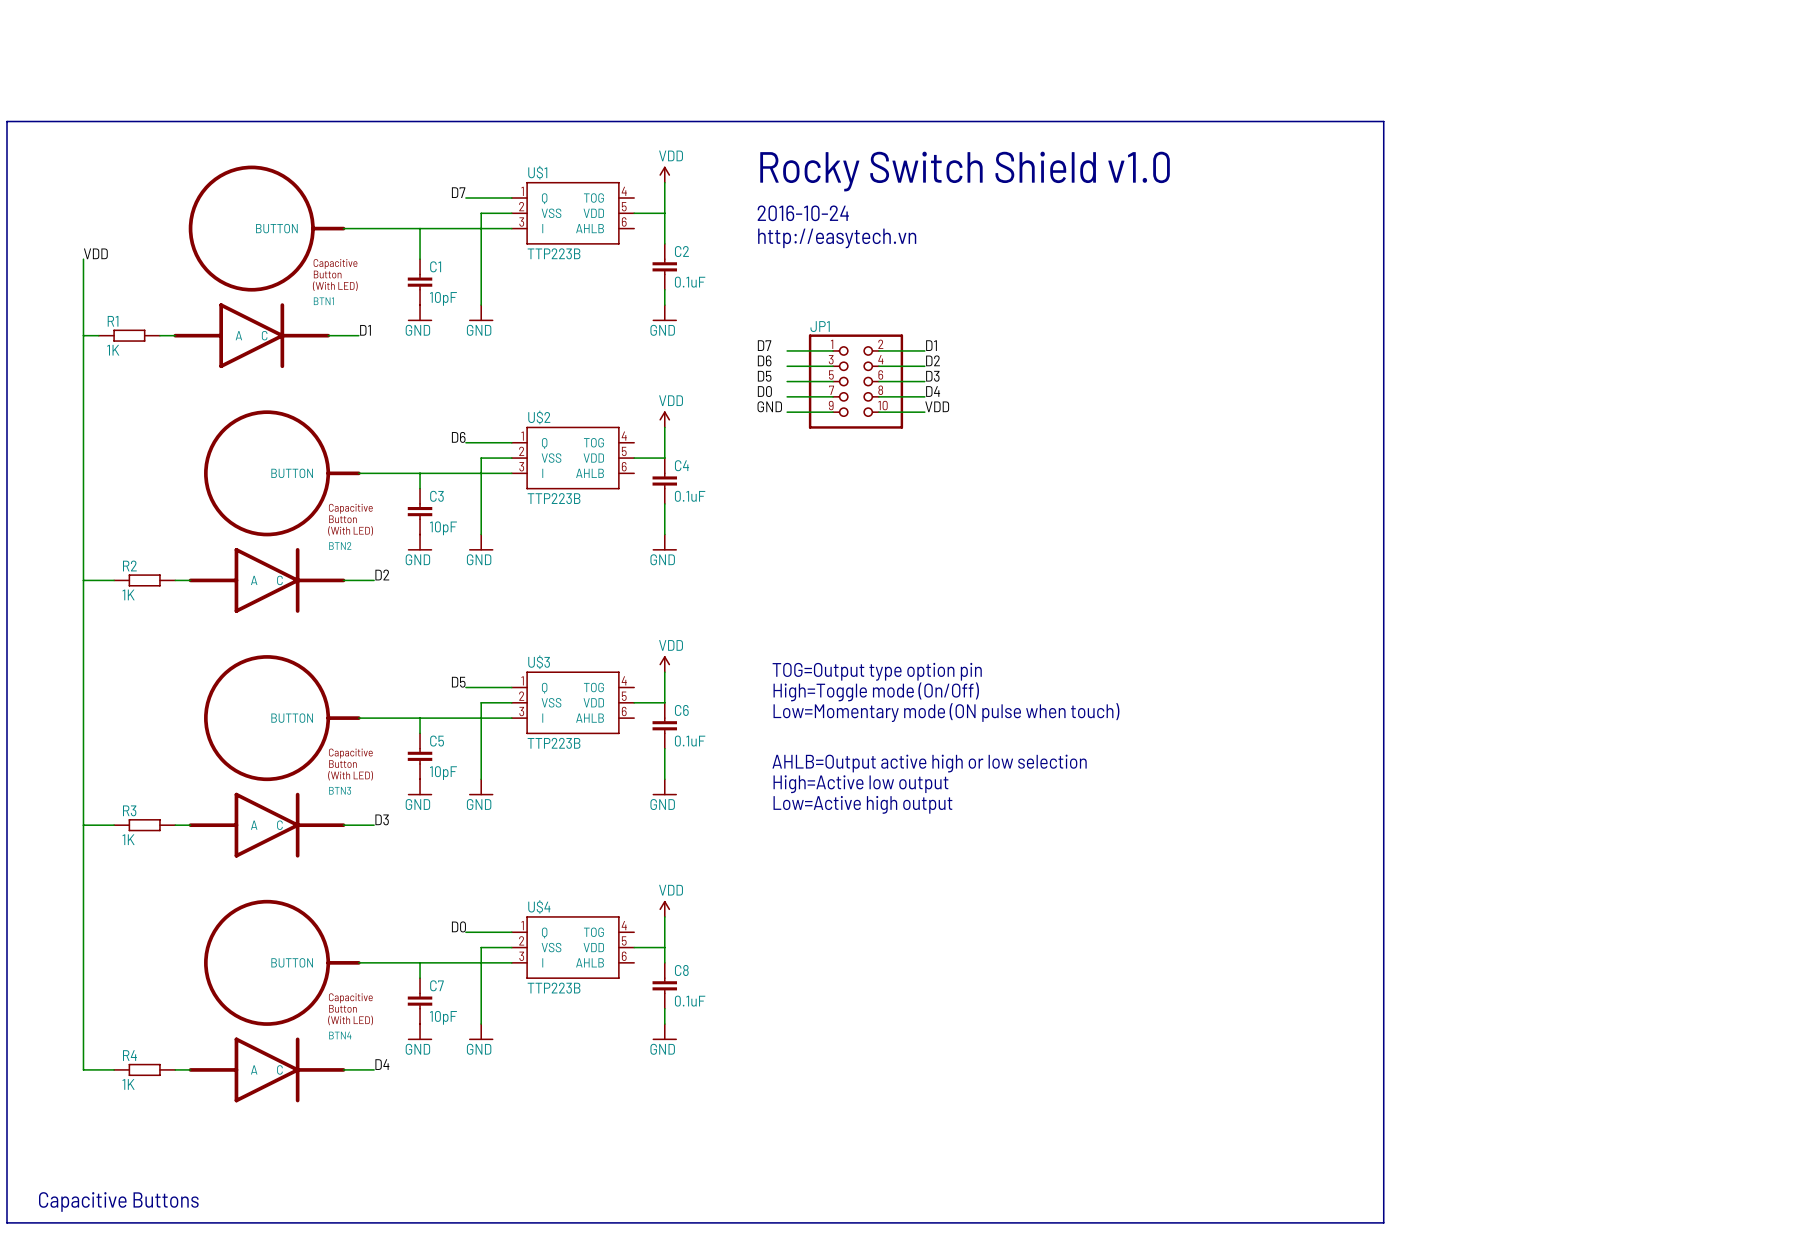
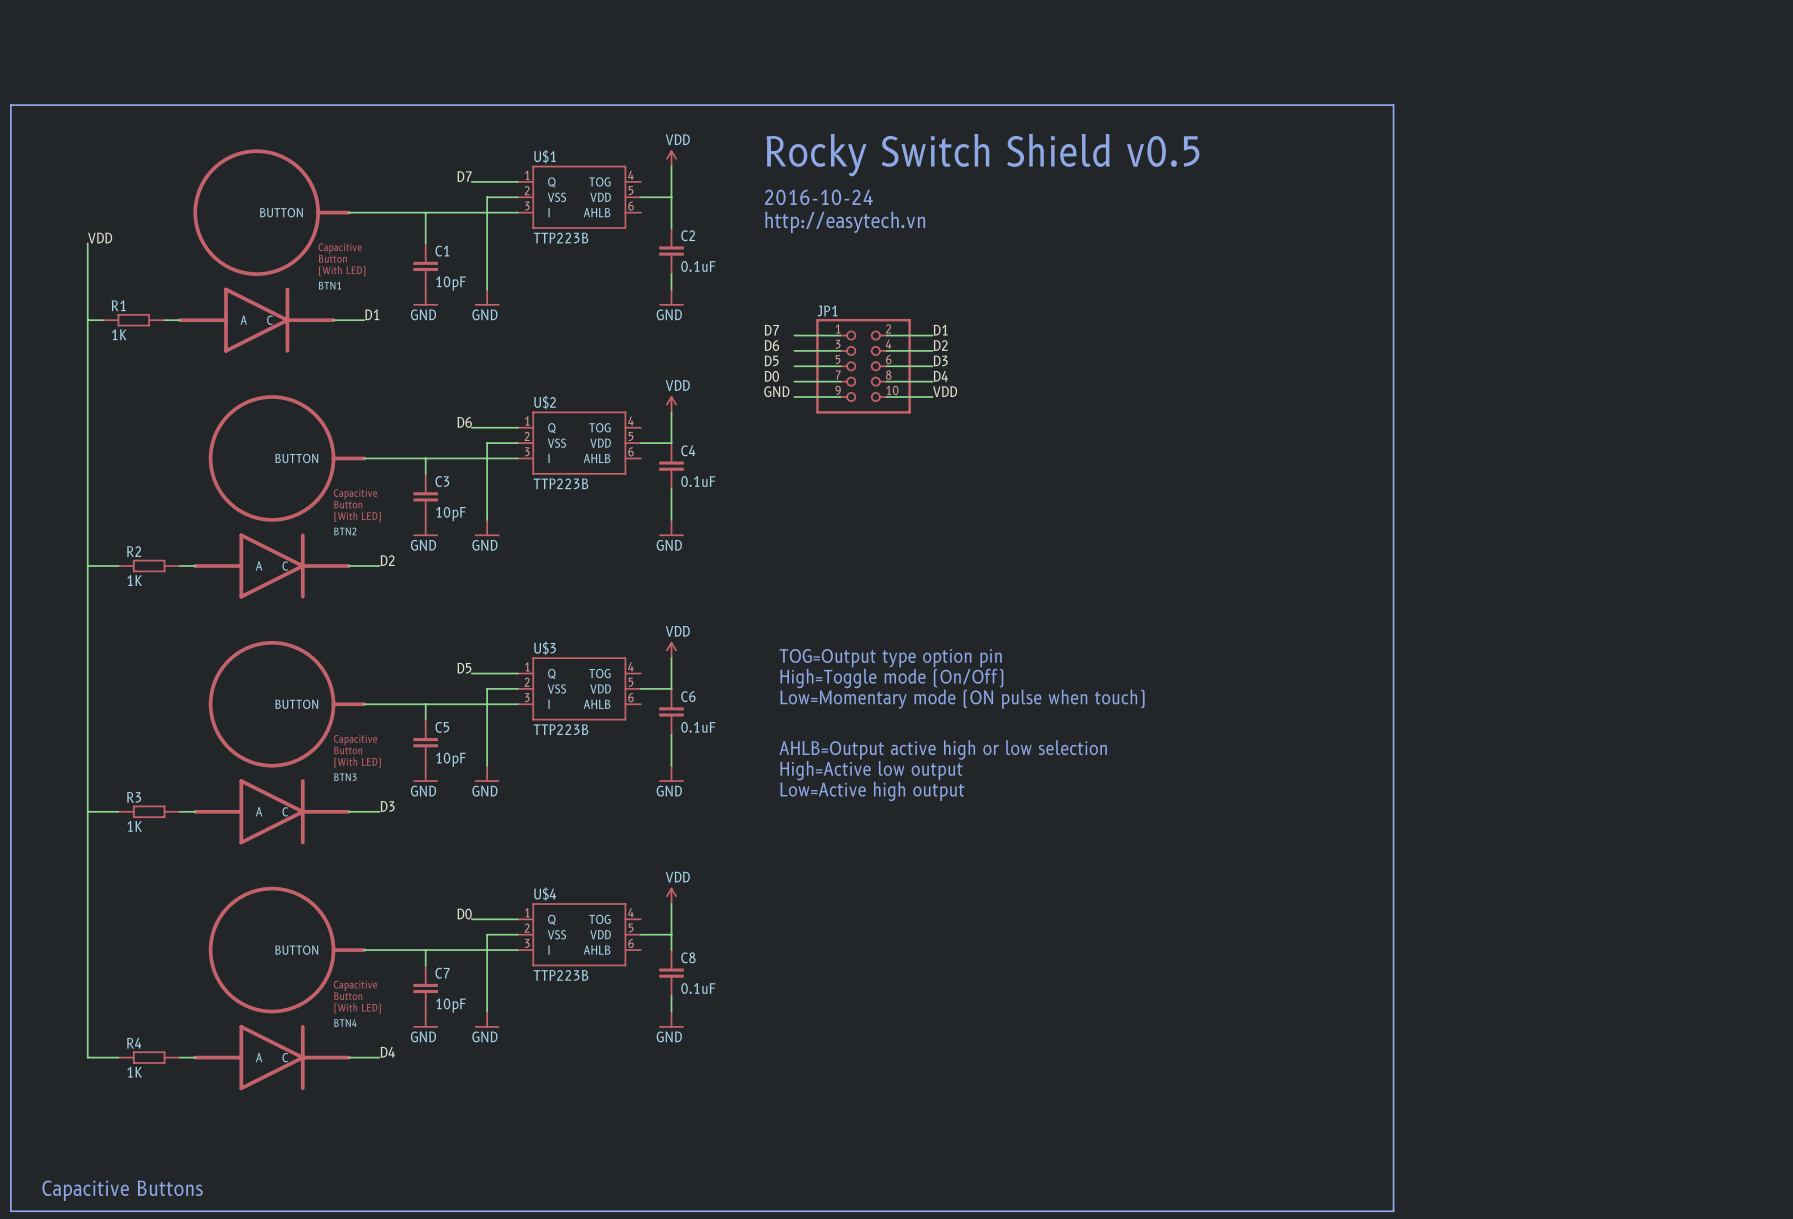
text: Rocky Switch Shield v1.0 (965, 171) -> Rocky Switch Shield v0.5 (982, 155)

